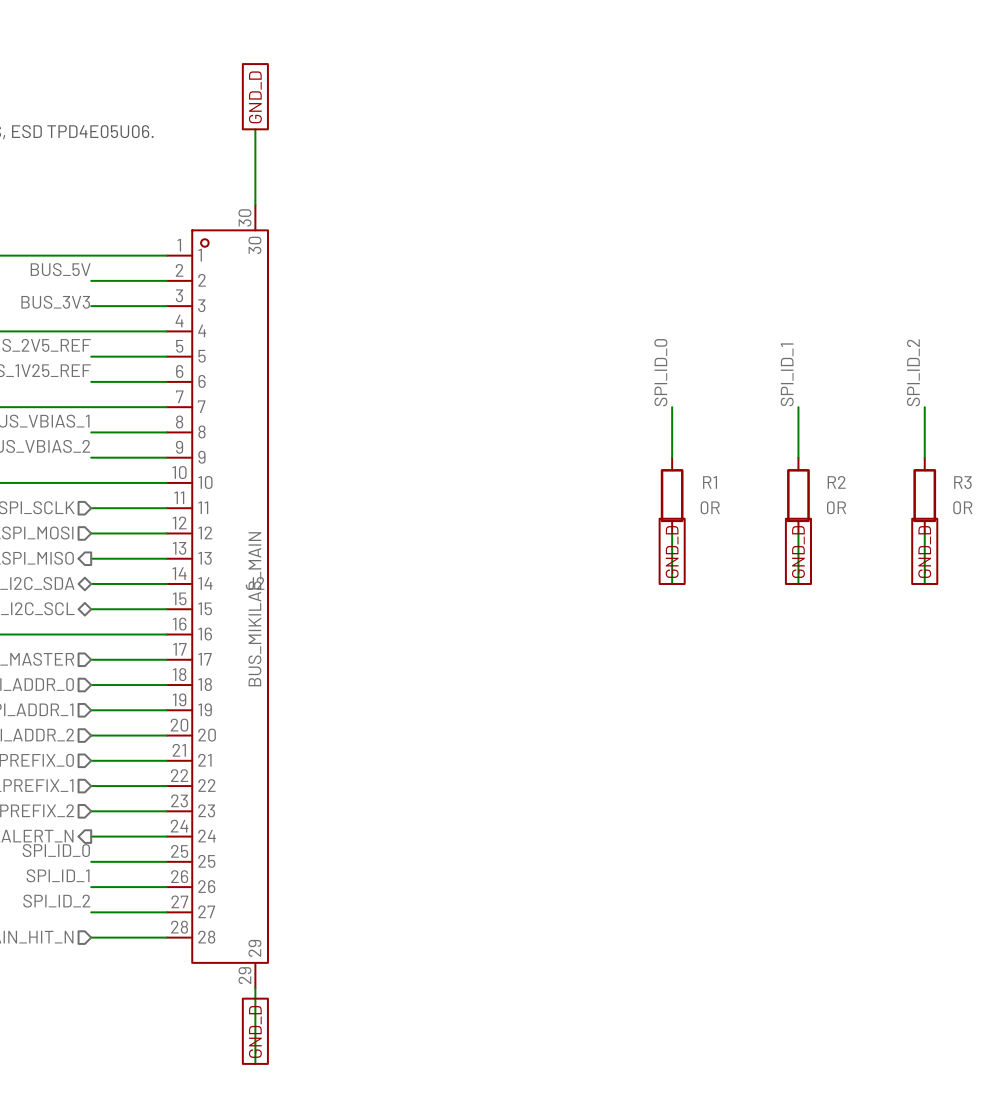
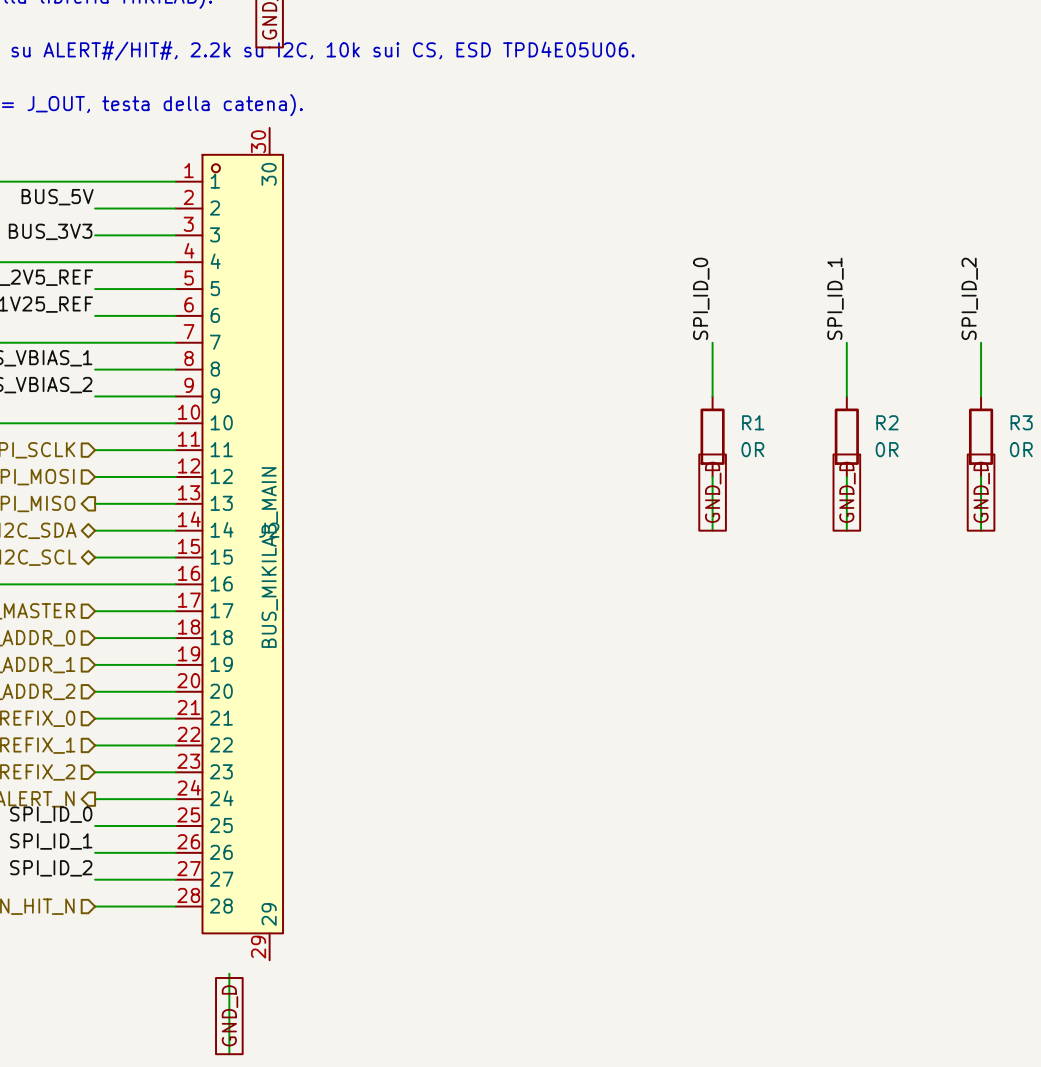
wire: (255, 129) (255, 205) -> none
wire: (255, 988) (255, 1063) -> (229, 973) (229, 1054)
global label position: GND_D (255, 1031) -> GND_D (229, 1015)

